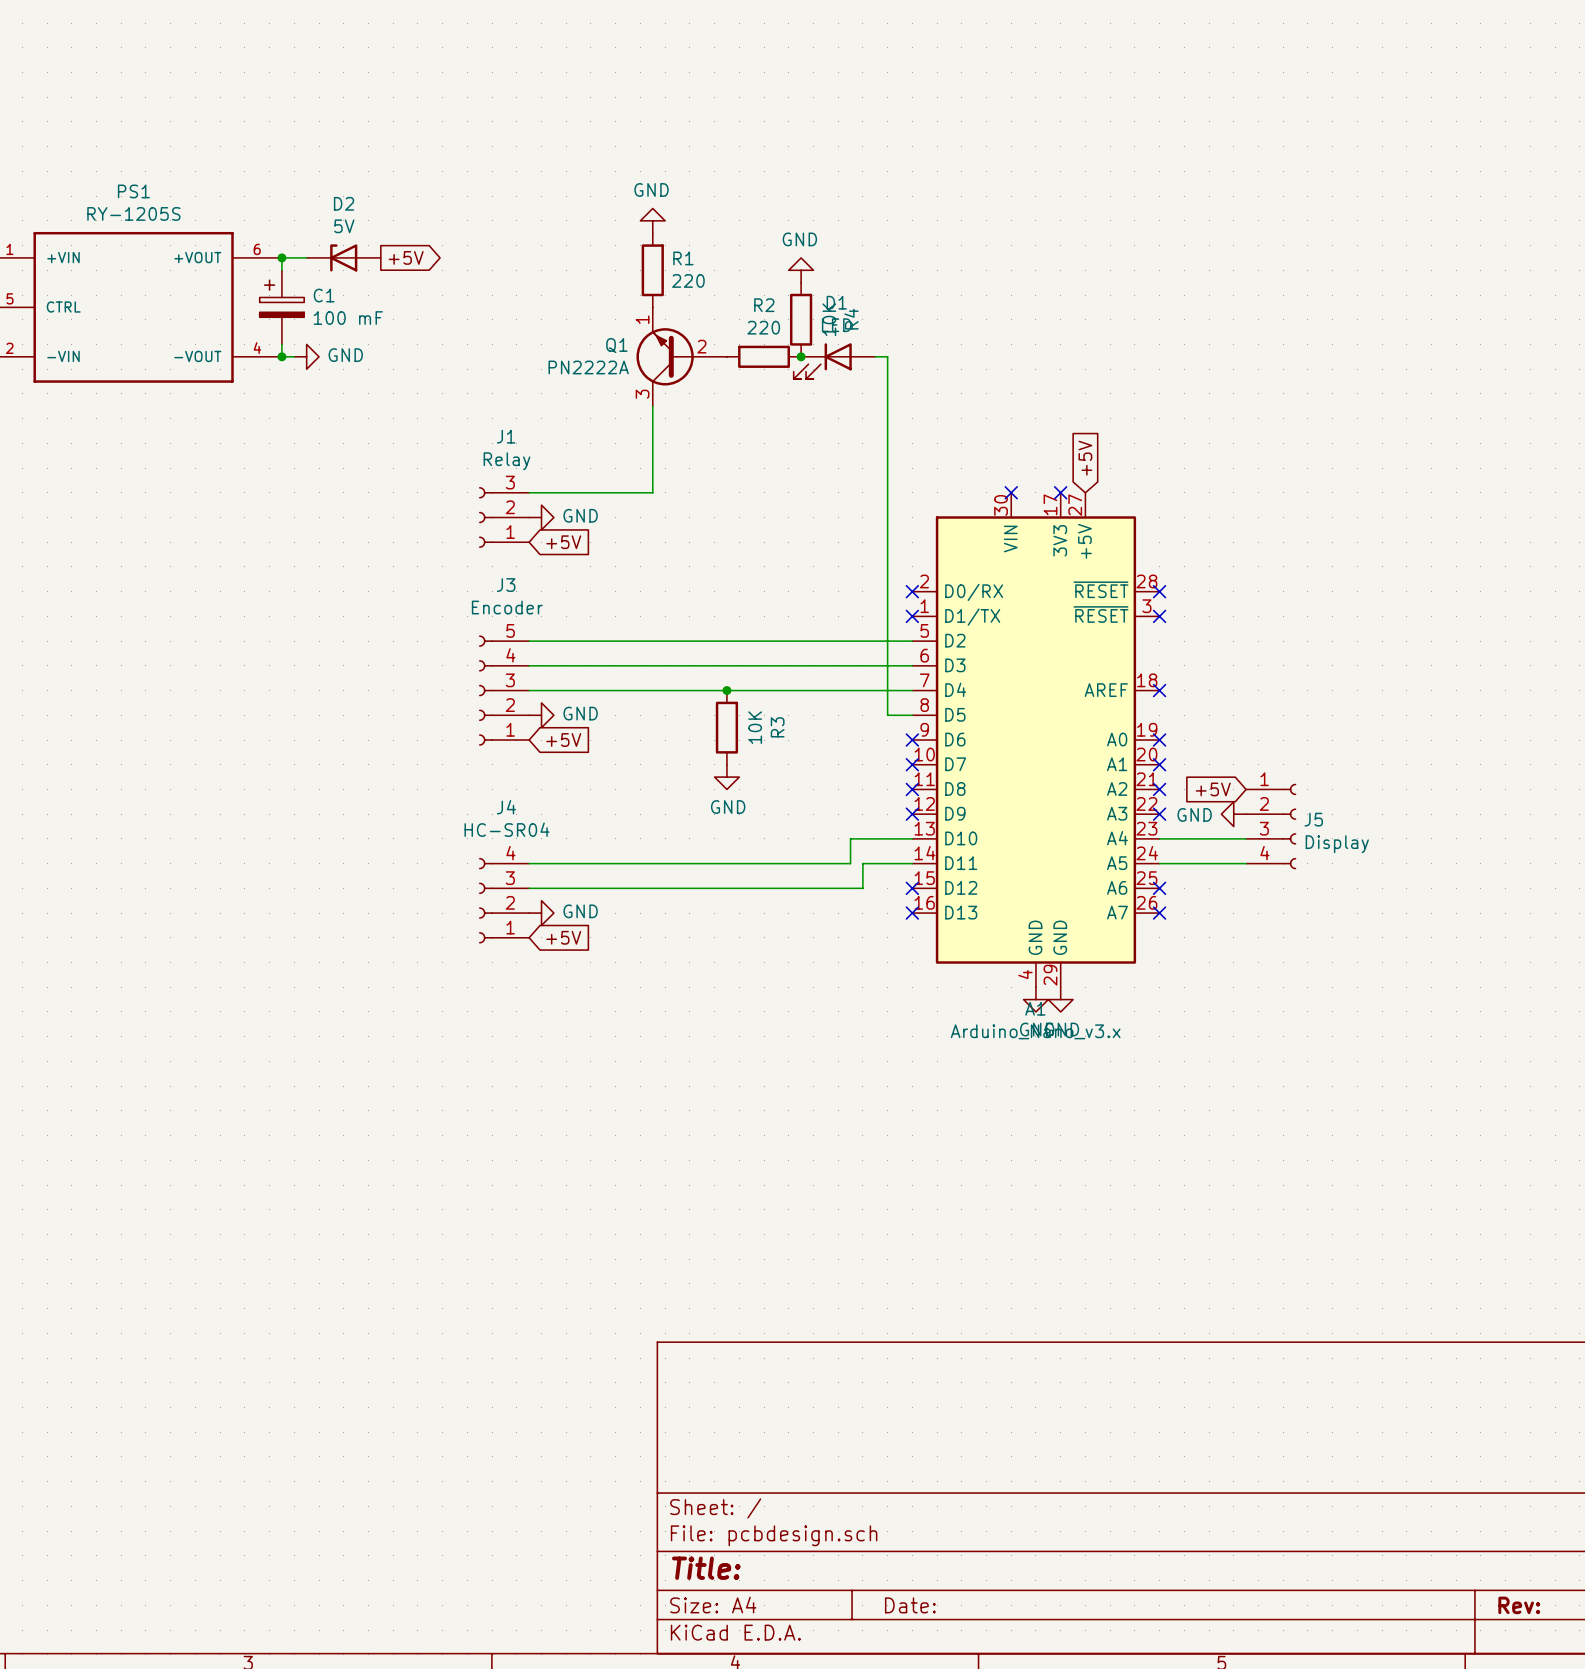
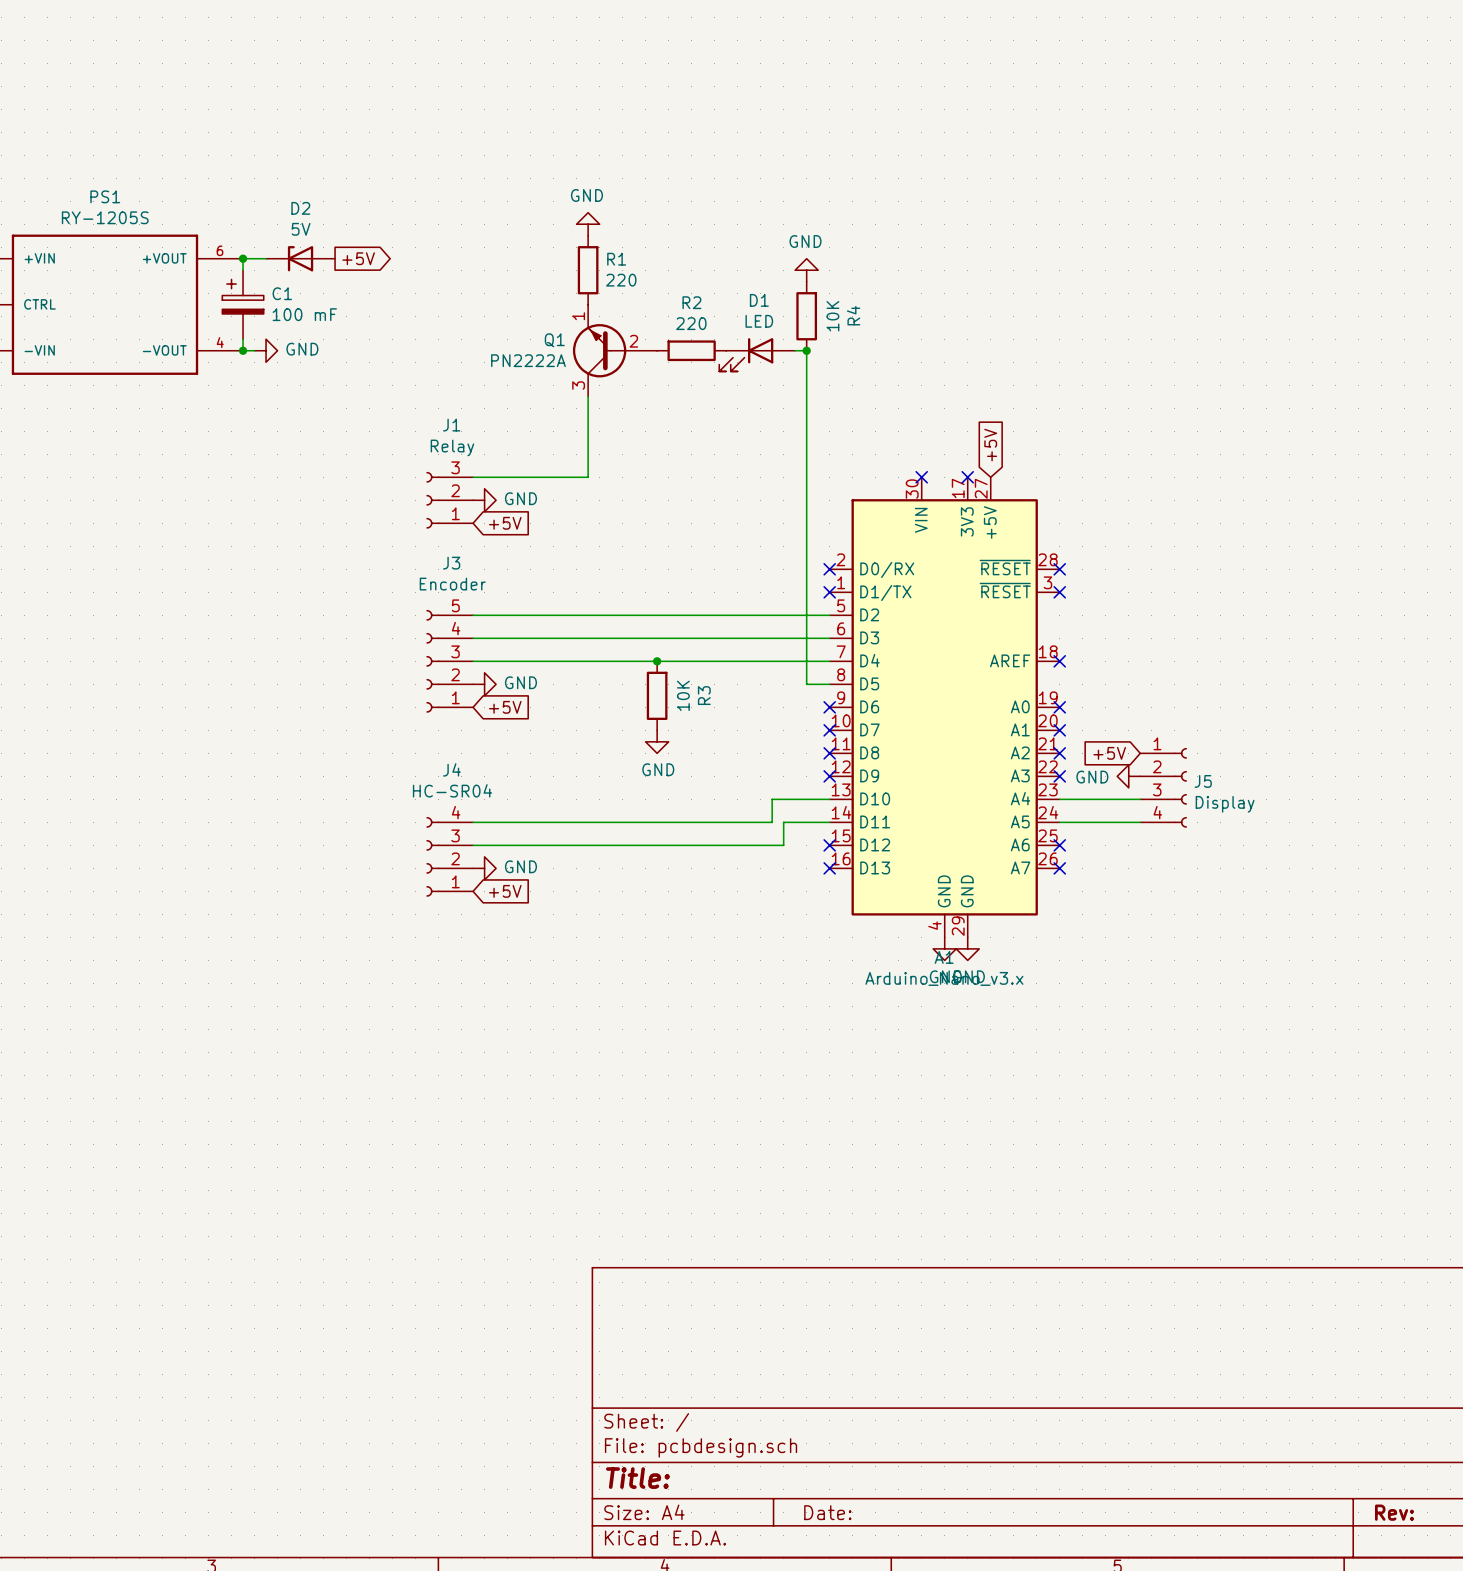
power symbol position: GND (801, 270) -> GND (806, 270)
R4 position: (801, 319) -> (806, 316)
junction: (801, 356) -> none
junction: none -> (806, 350)

